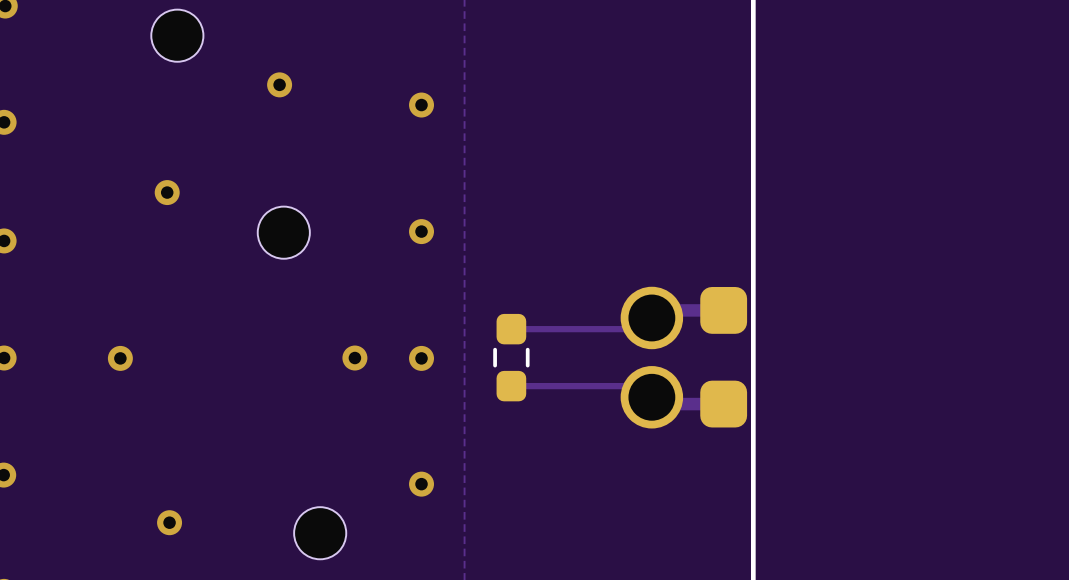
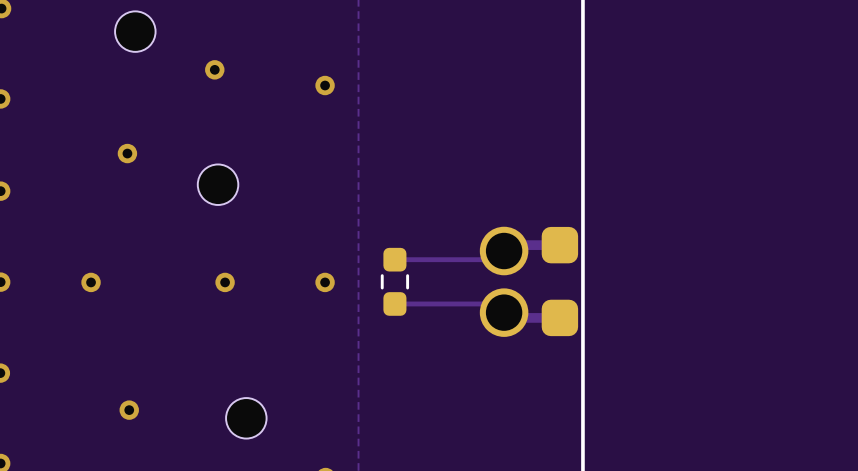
via: (421, 231) -> none
via position: (354, 358) -> (225, 282)
via: (421, 484) -> none

